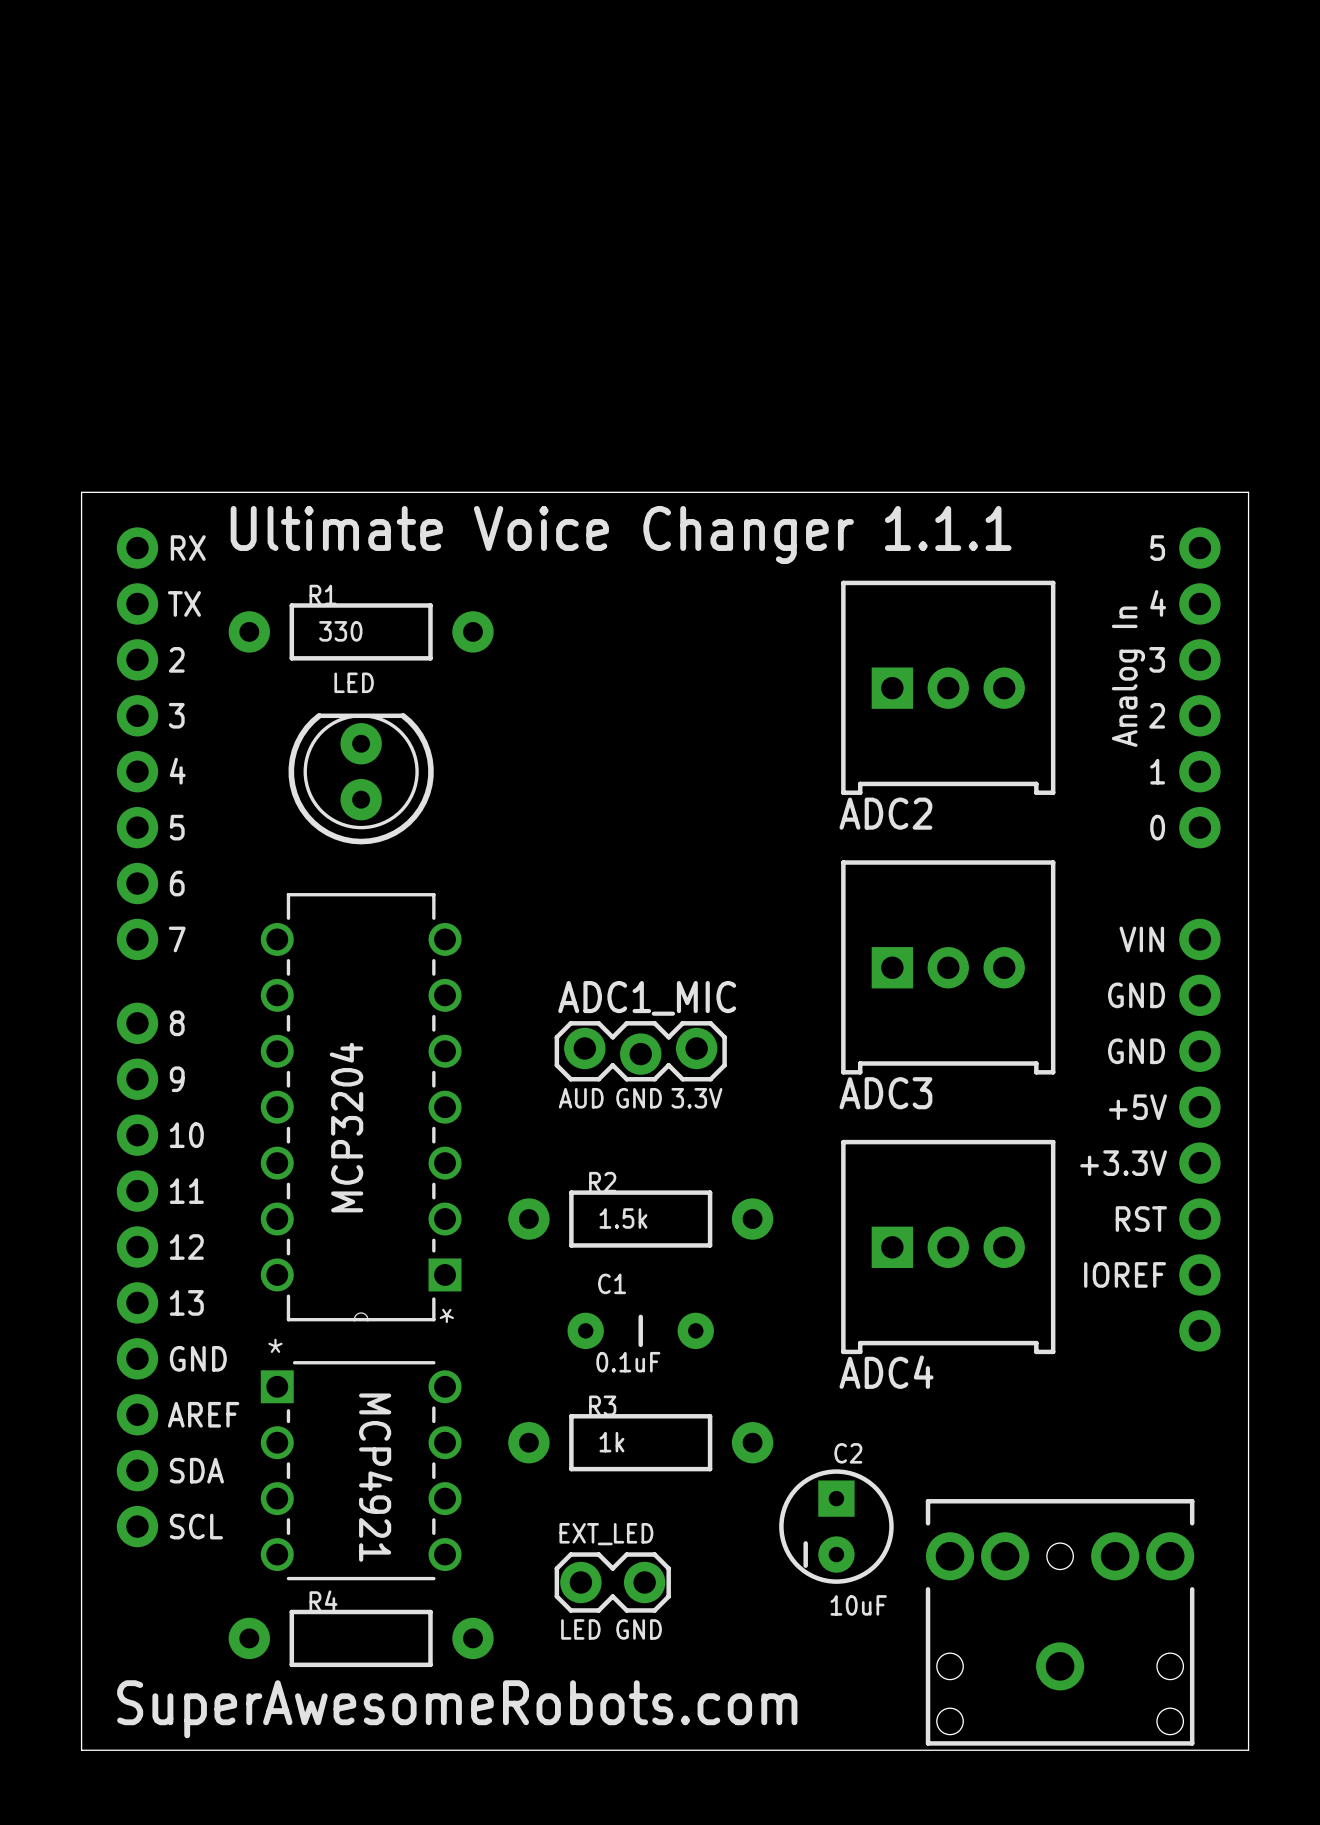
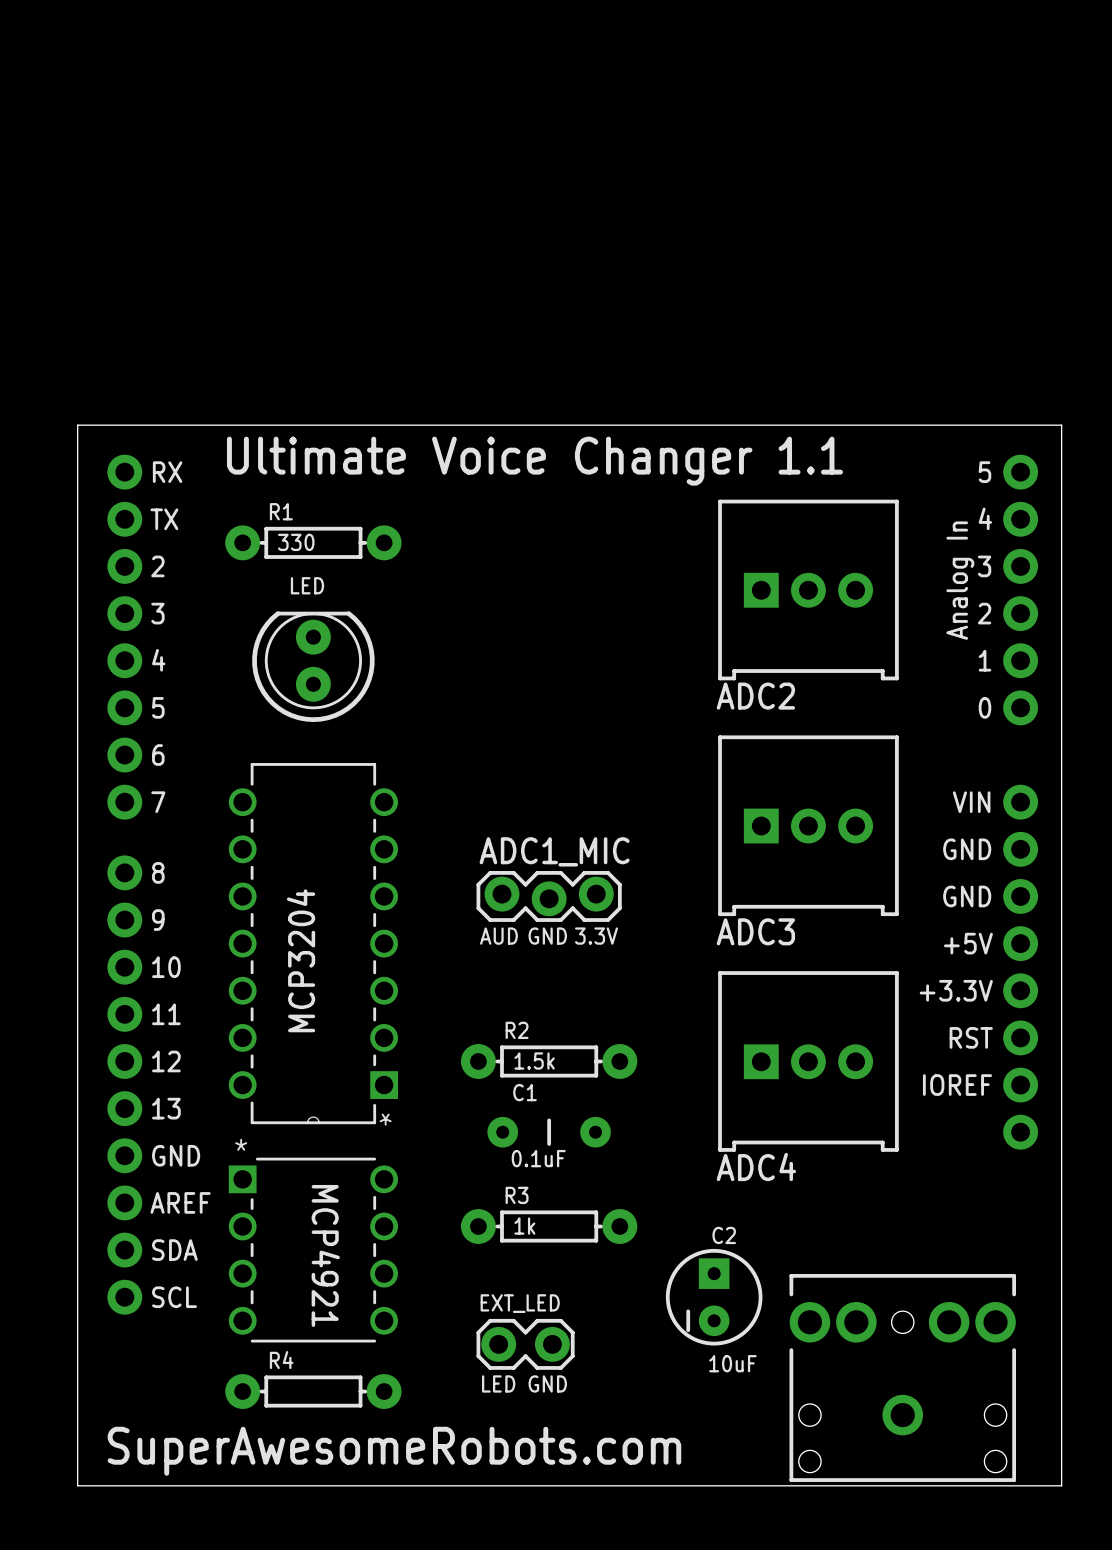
text: Ultimate Voice Changer 1.1.1 (621, 534) -> Ultimate Voice Changer 1.1 (534, 461)
R1 footprint: [228, 603, 494, 661] -> [225, 525, 402, 561]
R2 footprint: [508, 1190, 774, 1248] -> [460, 1044, 638, 1079]
R3 footprint: [508, 1414, 774, 1472] -> [460, 1209, 638, 1244]
R4 footprint: [228, 1609, 494, 1668] -> [225, 1374, 402, 1409]

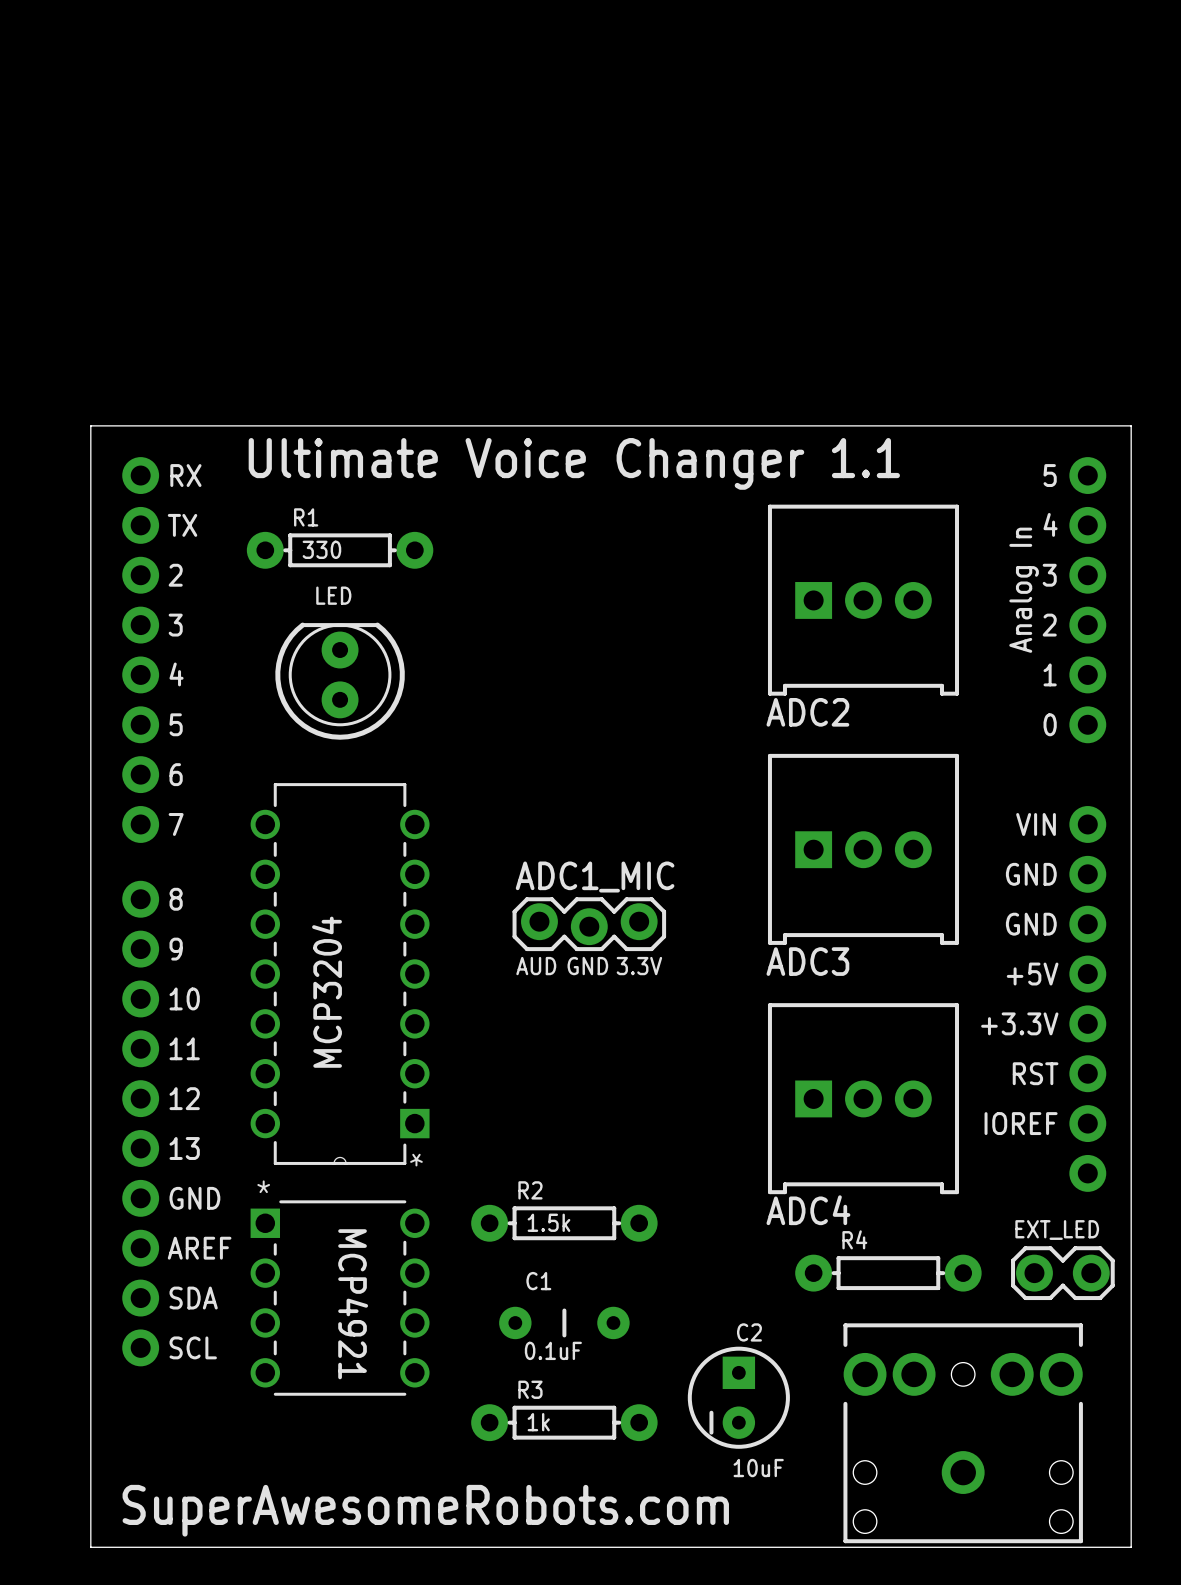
R2 position: (549, 1061) -> (564, 1223)
C1 position: (549, 1132) -> (564, 1322)
R3 position: (549, 1226) -> (564, 1422)
EXT_LED: none -> (1062, 1273)
C2 position: (714, 1297) -> (738, 1397)
EXT_LED: (525, 1344) -> none
text: LED (498, 1383) -> none
text: GND (547, 1383) -> none
R4 position: (313, 1391) -> (888, 1273)

